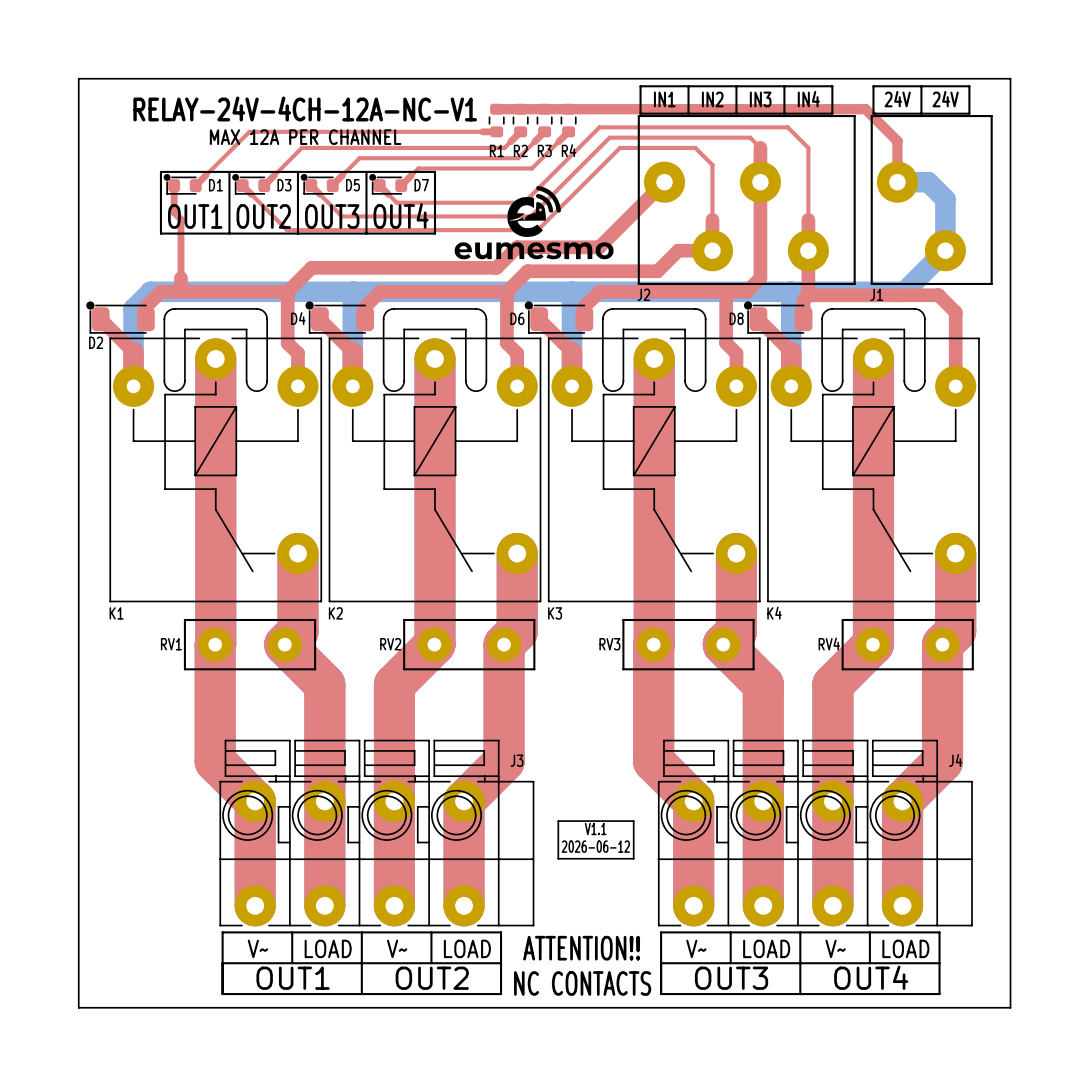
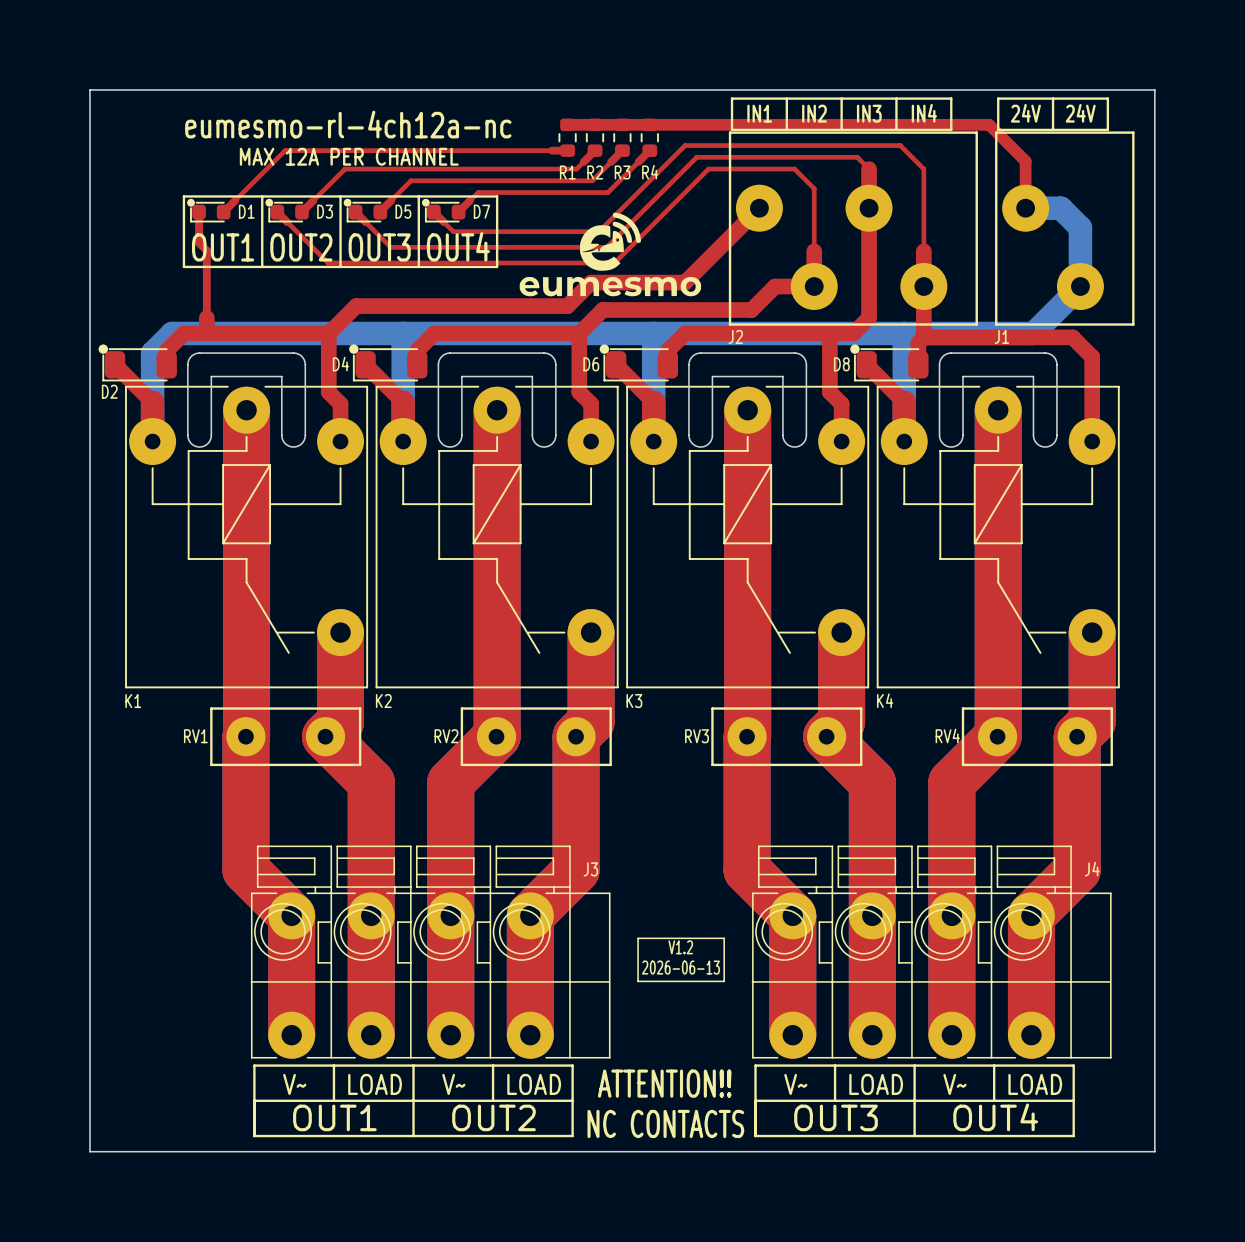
text: RELAY-24V-4CH-12A-NC-V1 (305, 108) -> eumesmo-rl-4ch12a-nc (348, 124)
text: V1.1 (595, 828) -> V1.2 (680, 947)
text: 2026-06-12 (595, 846) -> 2026-06-13 (680, 967)

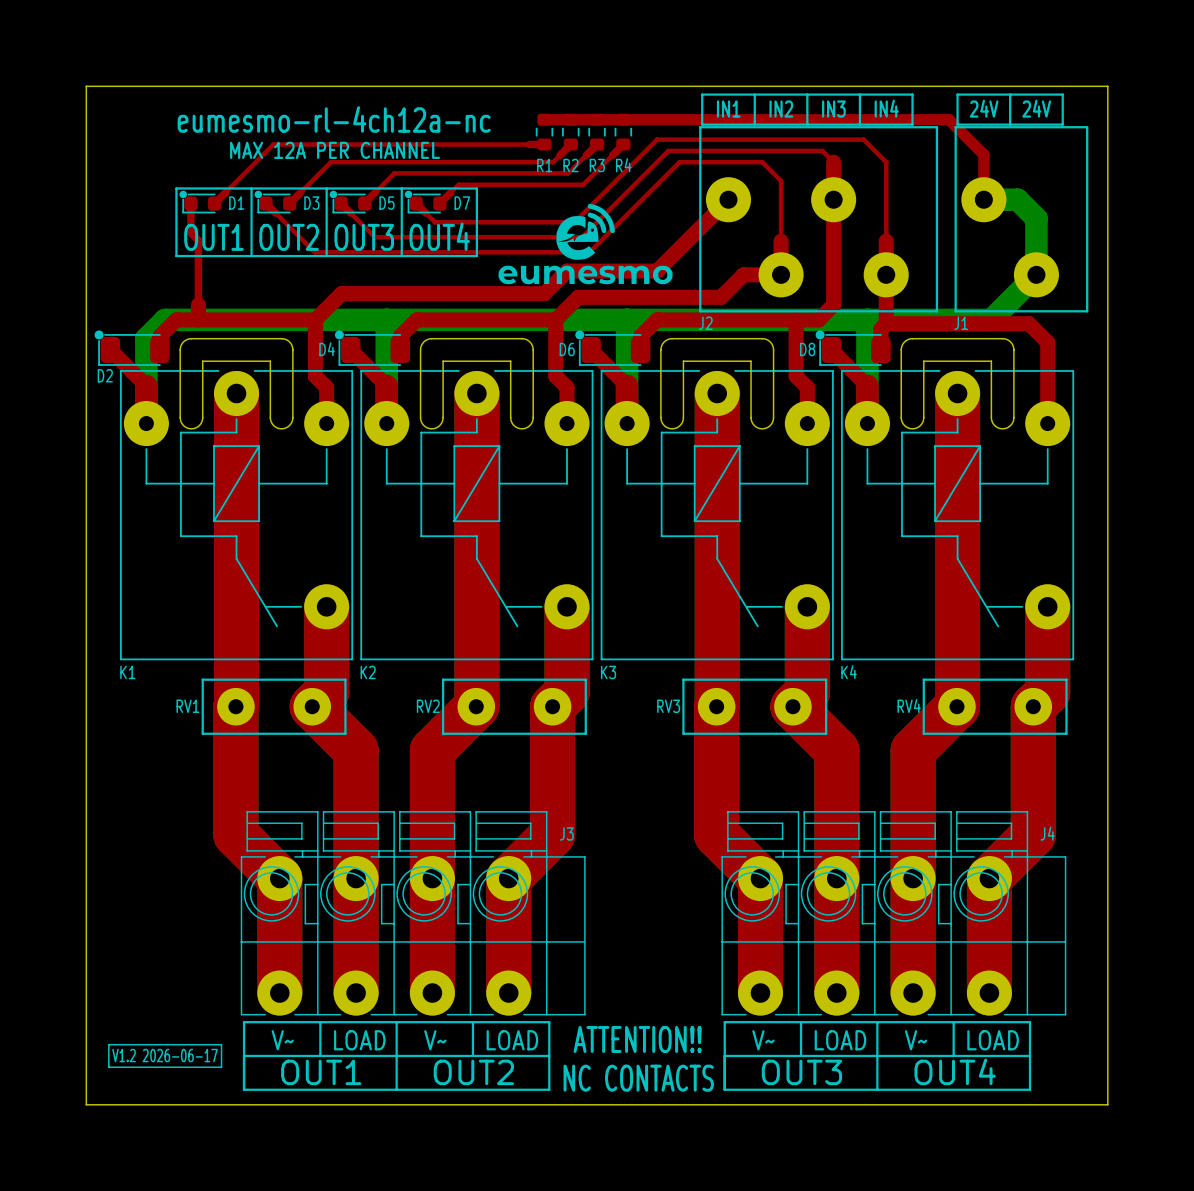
line: (638, 938) (724, 938) (724, 981) (638, 981) (638, 938) -> none
text: V1.2 (680, 947) -> none
text: 2026-06-13 (680, 967) -> none
line: none -> (108, 1044) (221, 1044) (221, 1067) (108, 1067) (108, 1044)
text: none -> V1.2 2026-06-17 (165, 1055)

